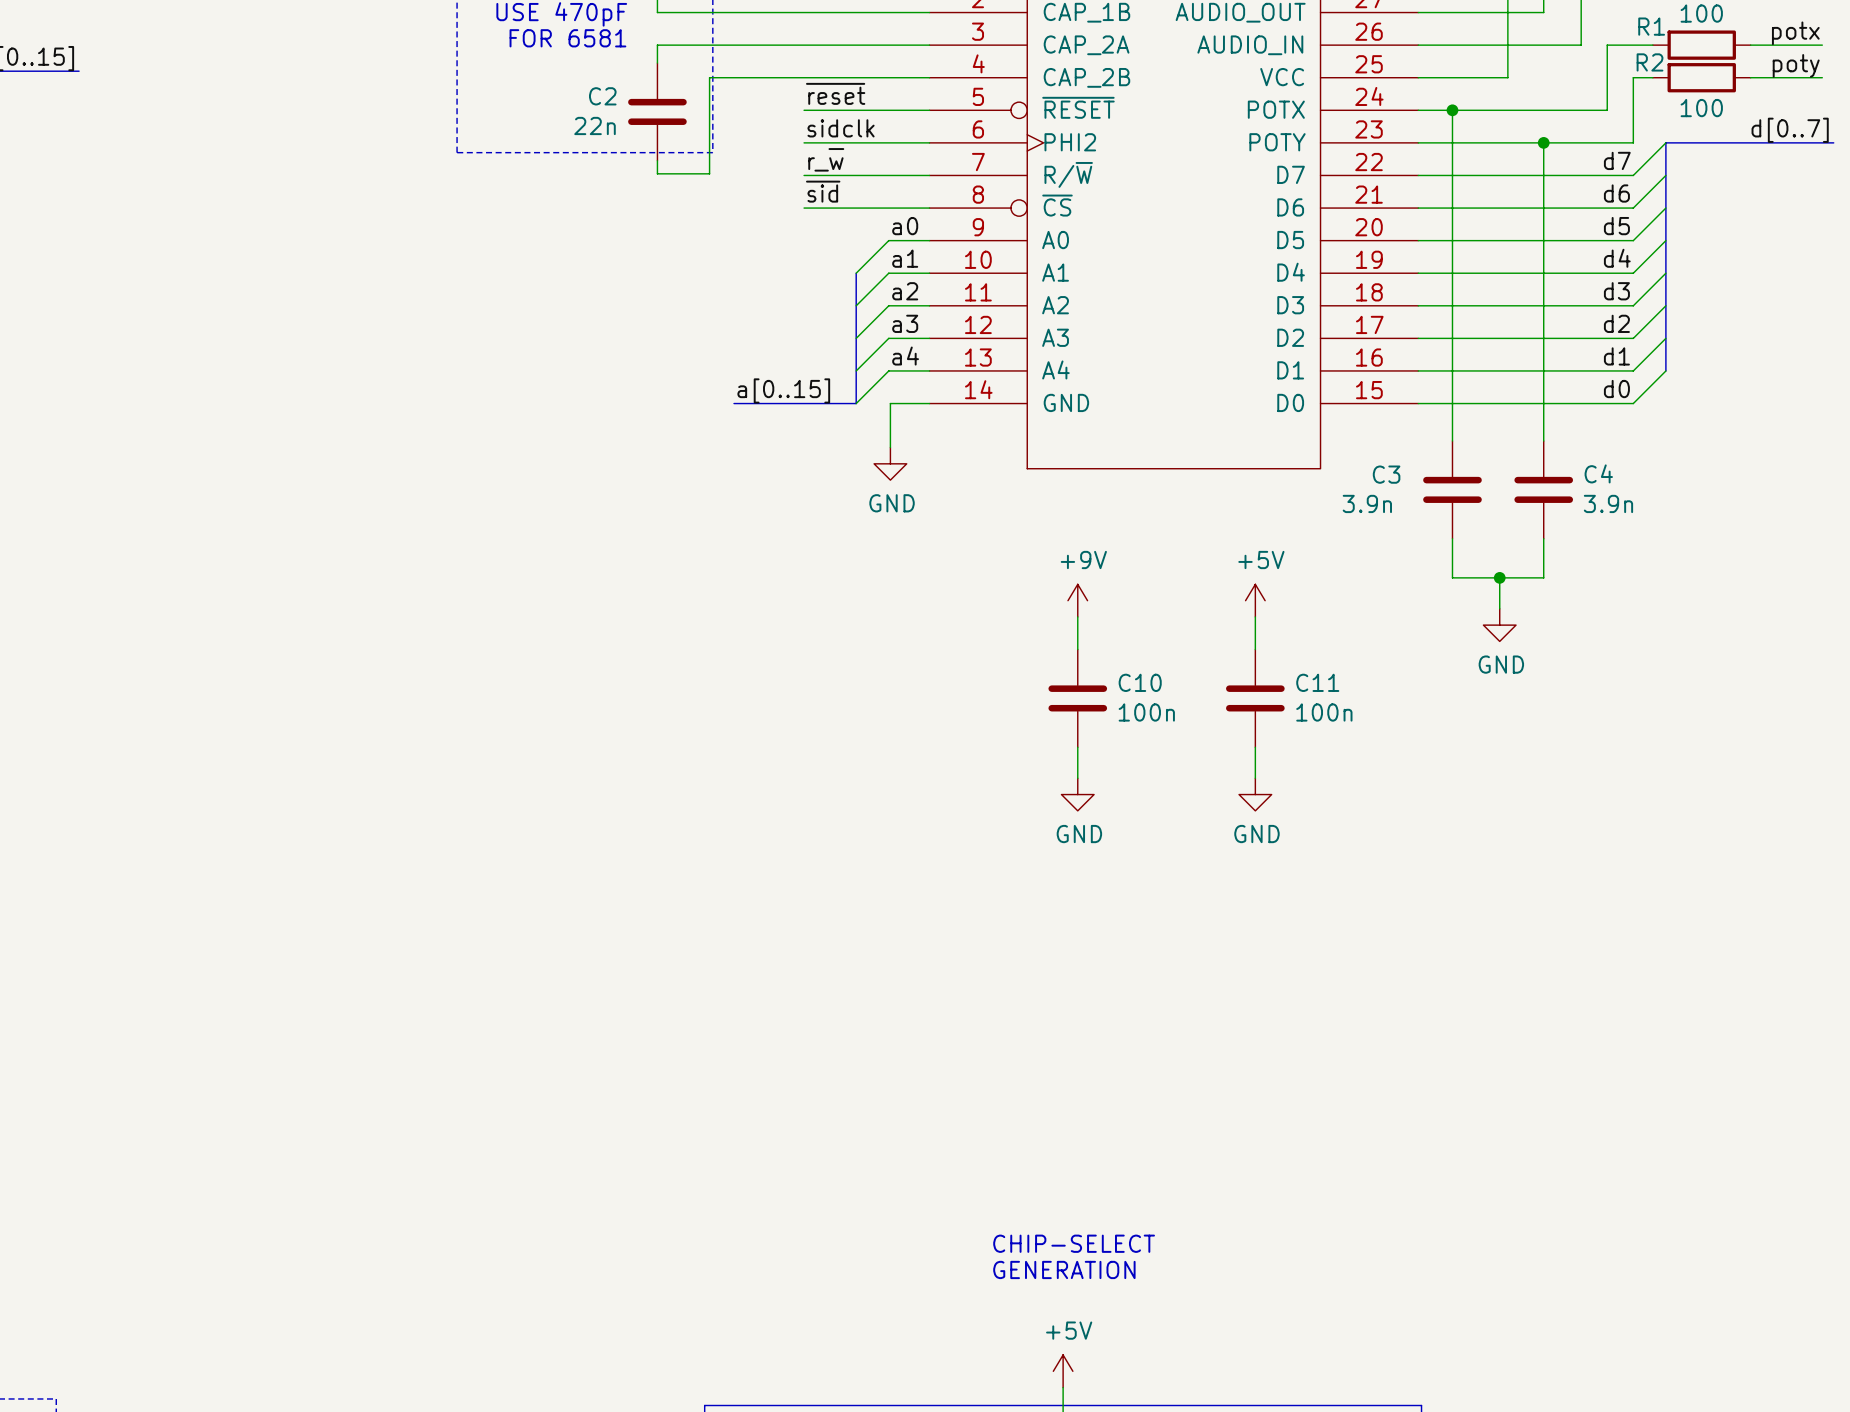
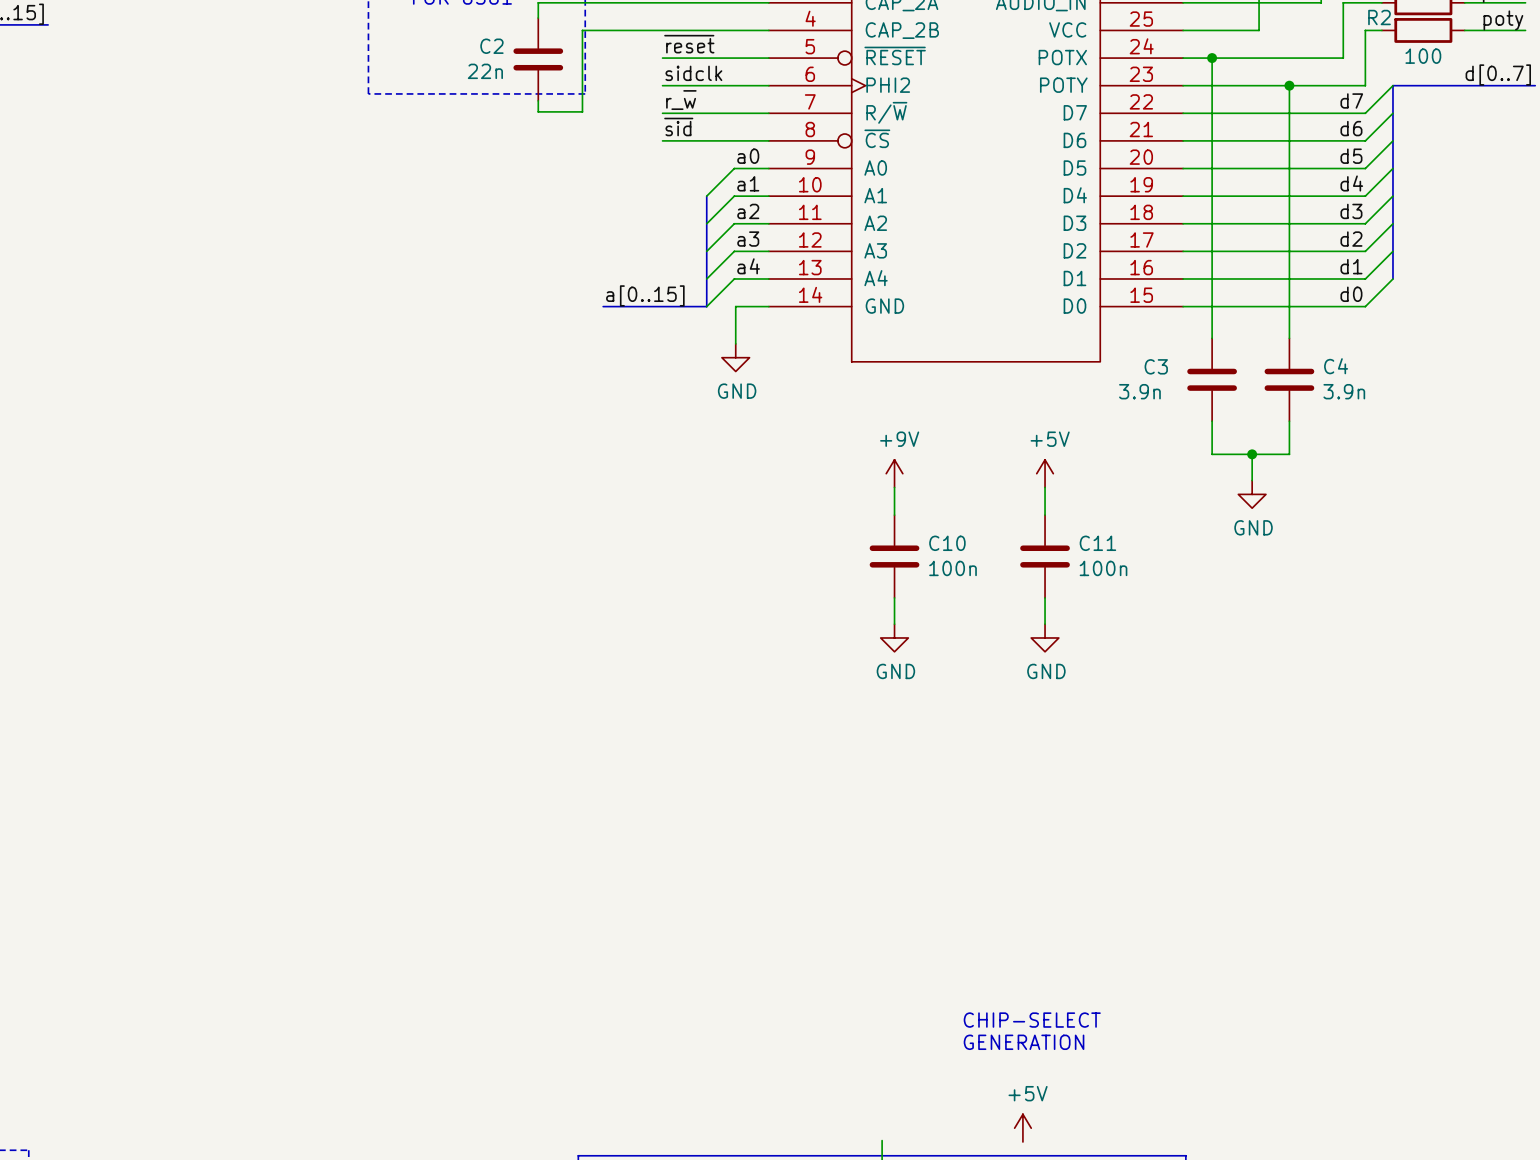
text position: CHIP-SELECT (1074, 1243) -> CHIP-SELECT (1032, 1020)
text position: GENERATION (1064, 1269) -> GENERATION (1024, 1042)
power symbol position: +5V (1063, 1371) -> +5V (1022, 1128)

